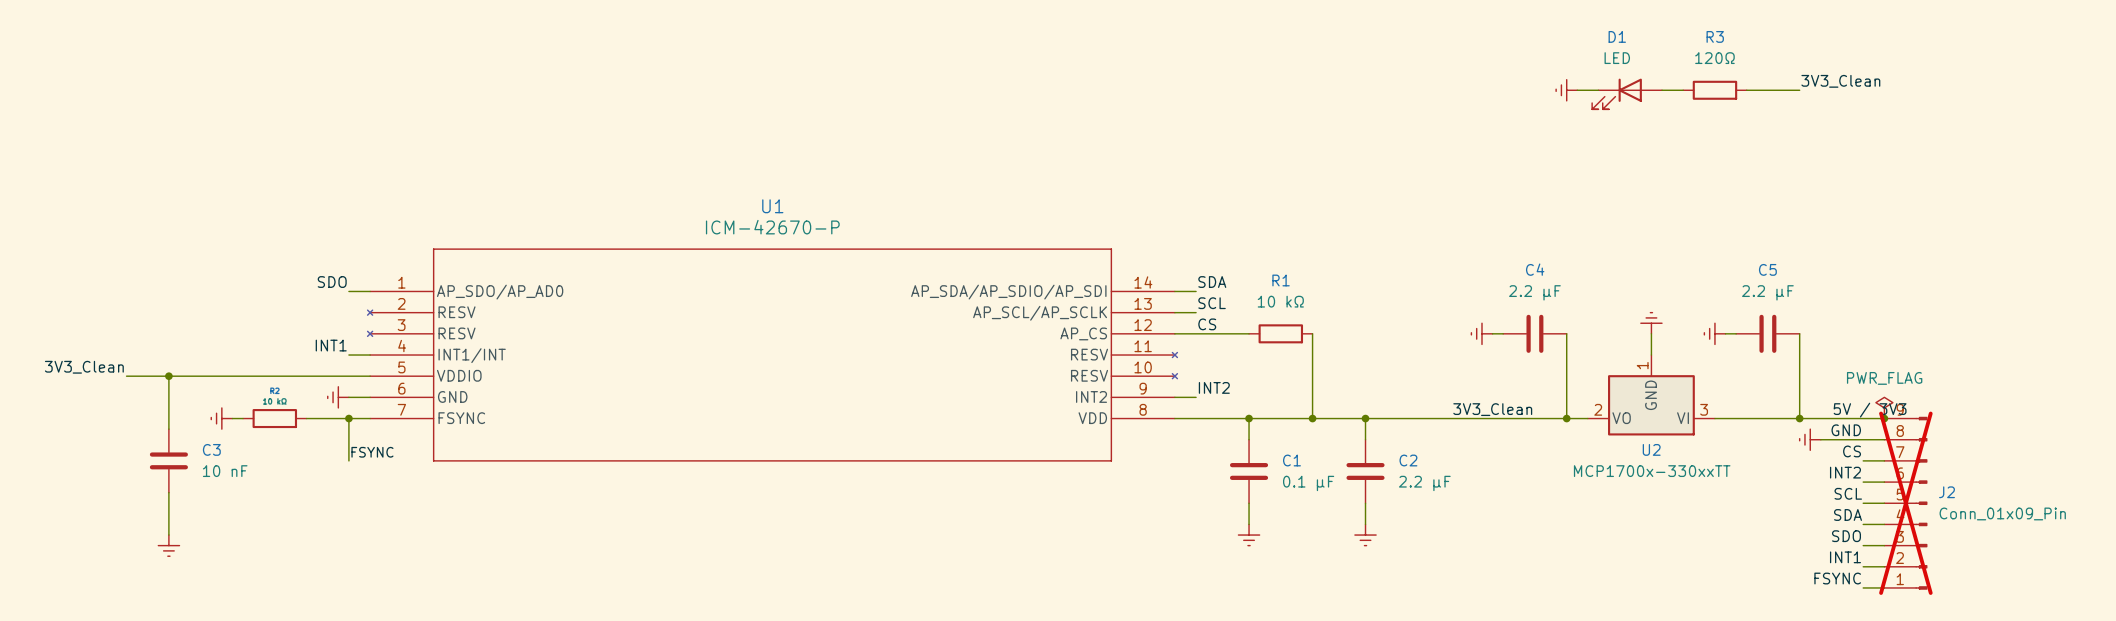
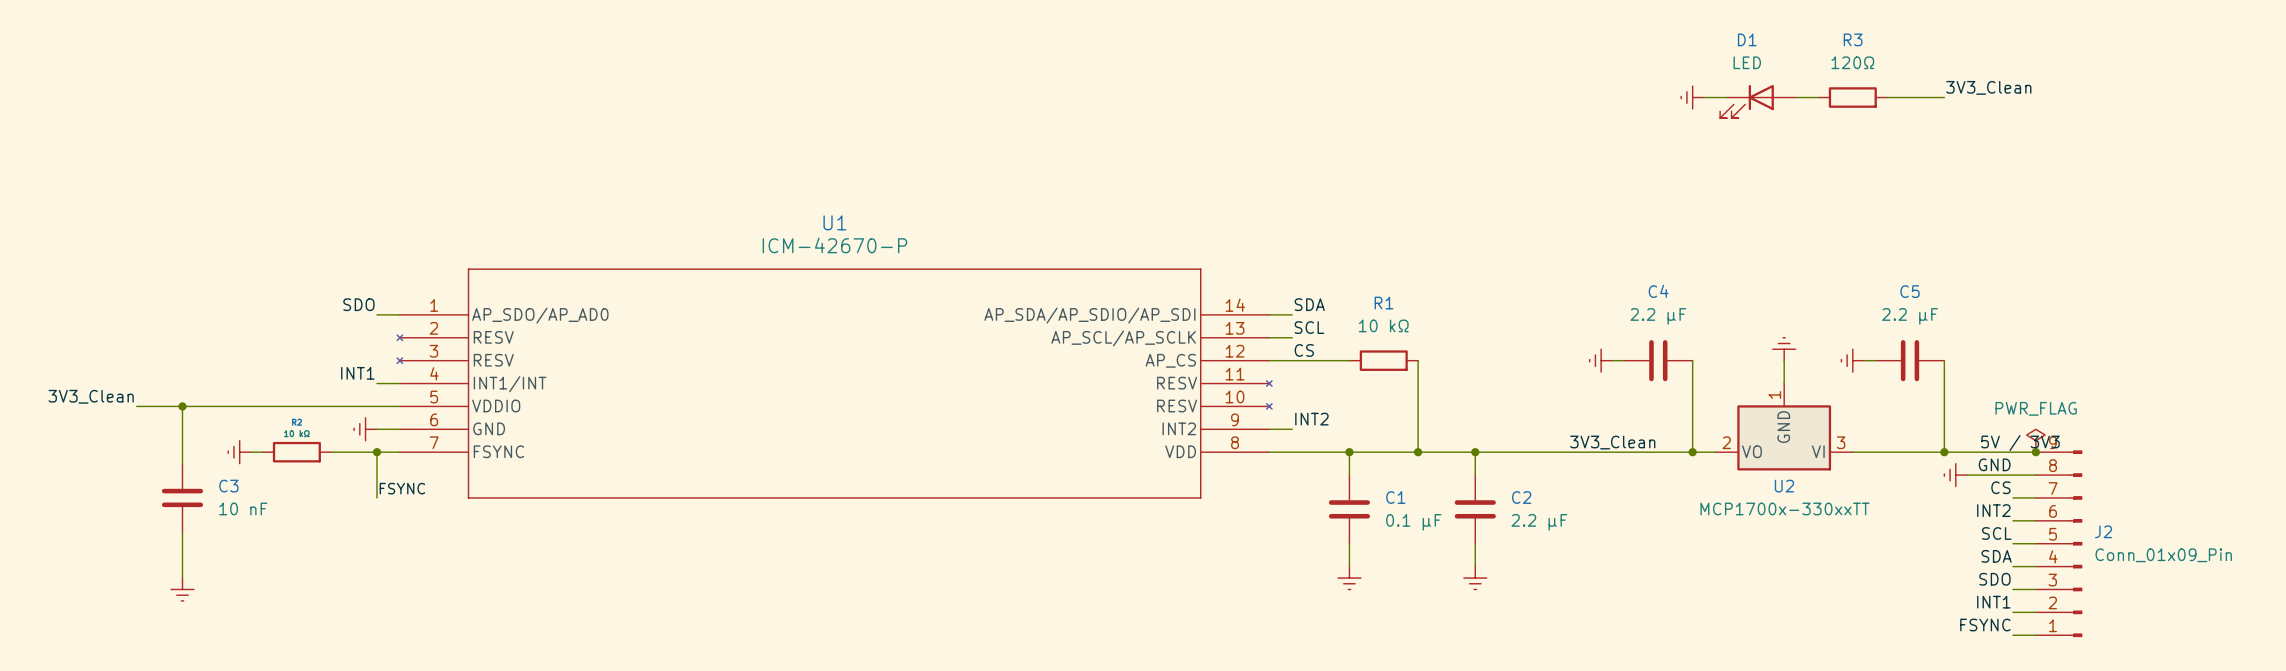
J2 do-not-place cross: (1905, 503) -> none

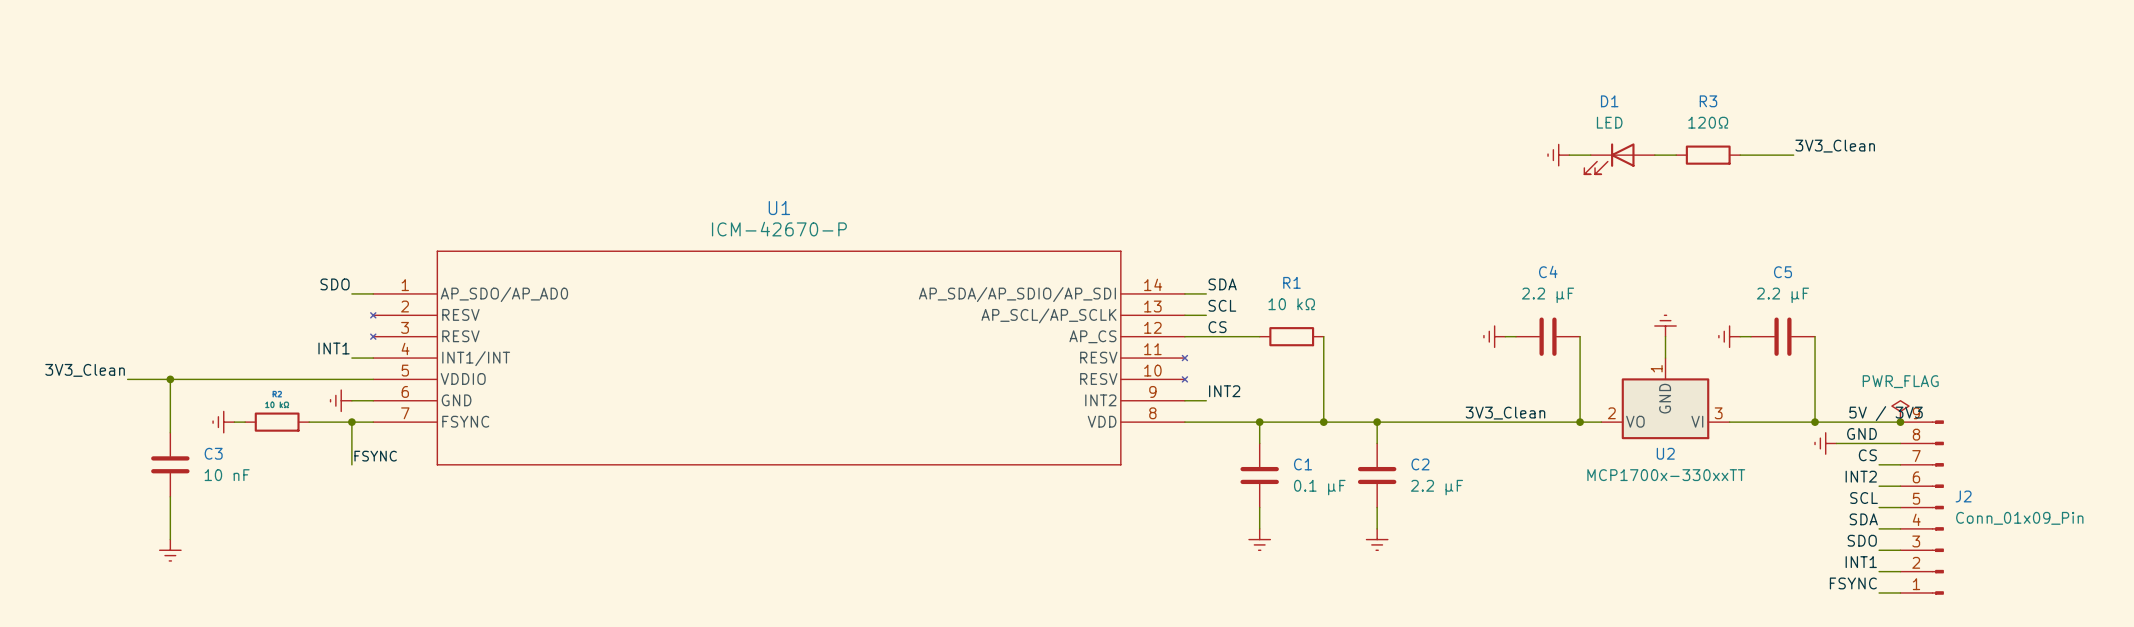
label position: 3V3_Clean (1988, 87) -> 3V3_Clean (1835, 146)
power symbol position: (1692, 97) -> (1558, 155)
wire: (1704, 97) (1726, 97) -> (1569, 155) (1590, 155)
wire: (1795, 97) (1818, 97) -> (1654, 155) (1676, 155)
R3 position: (1852, 97) -> (1708, 155)
wire: (1887, 97) (1944, 97) -> (1740, 155) (1793, 155)
D1 position: (1757, 101) -> (1619, 158)

